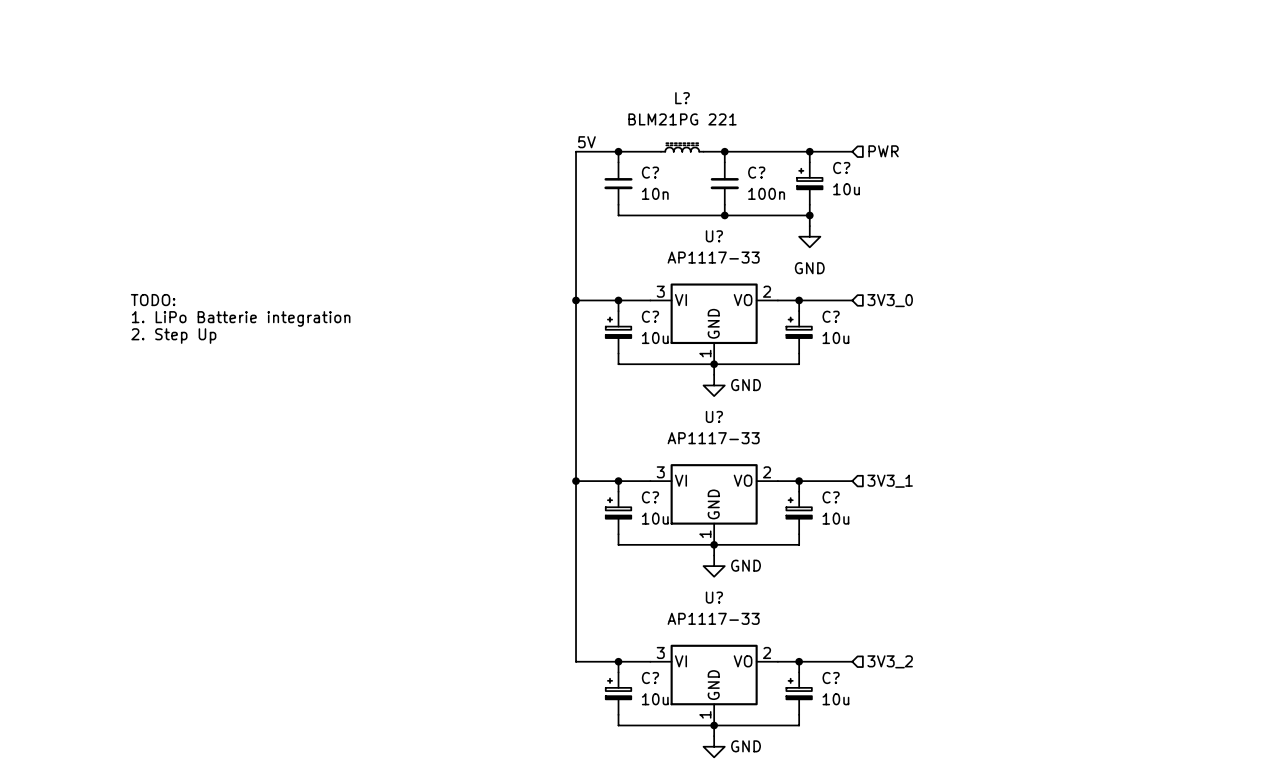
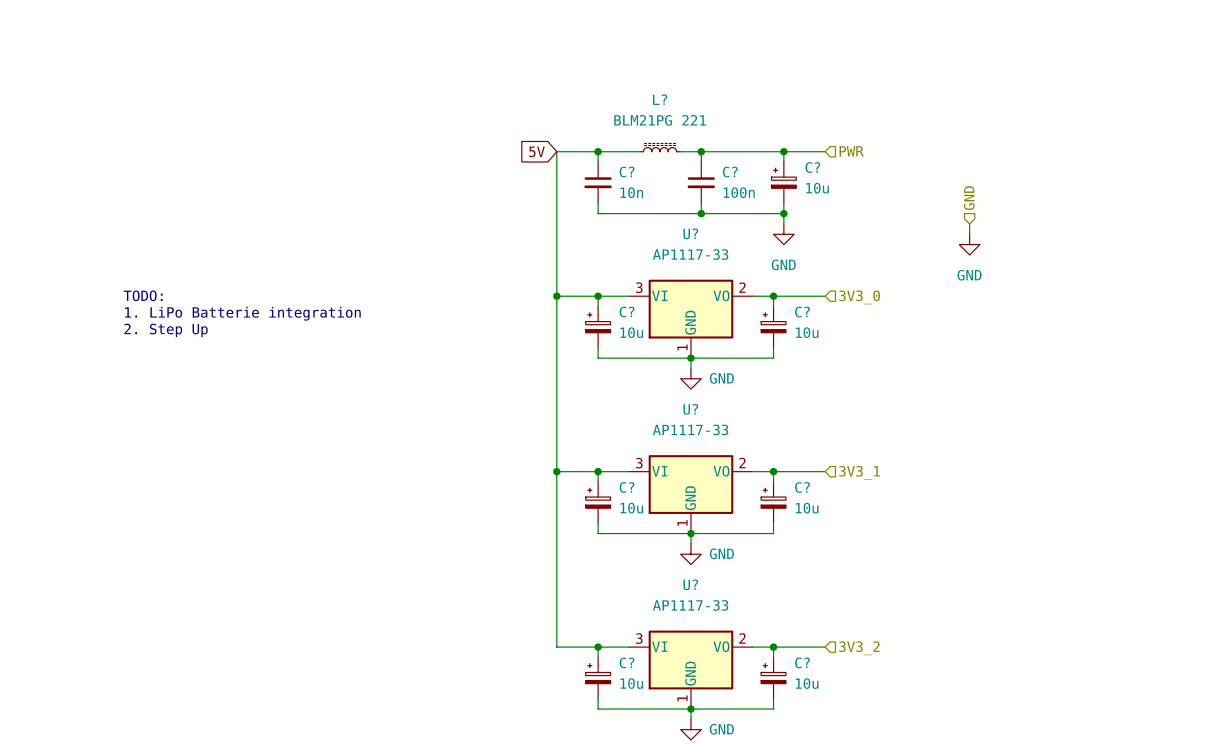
label: 5V (586, 142) -> none
global label: none -> 5V (536, 151)
hierarchical label: none -> GND (969, 198)
wire: none -> (969, 223) (969, 234)
power symbol: none -> GND (969, 244)

